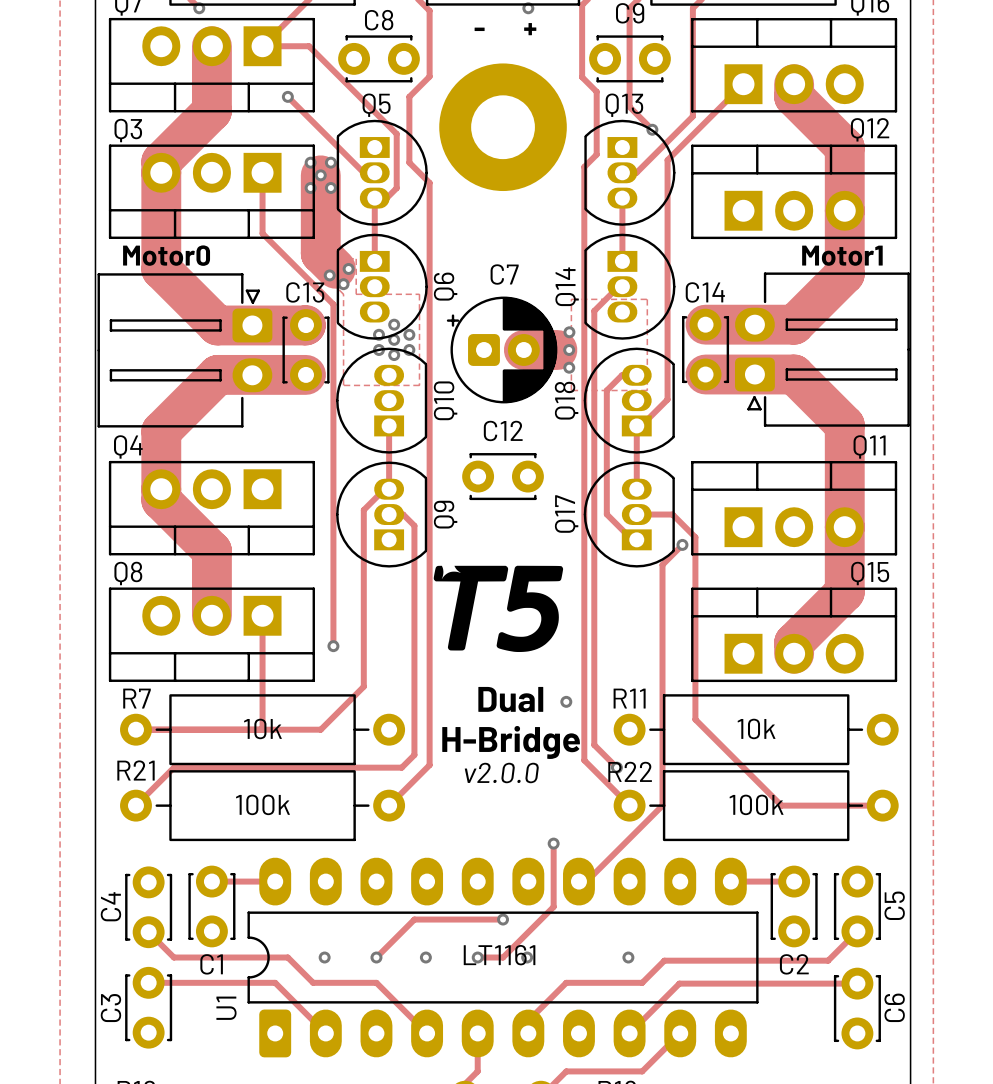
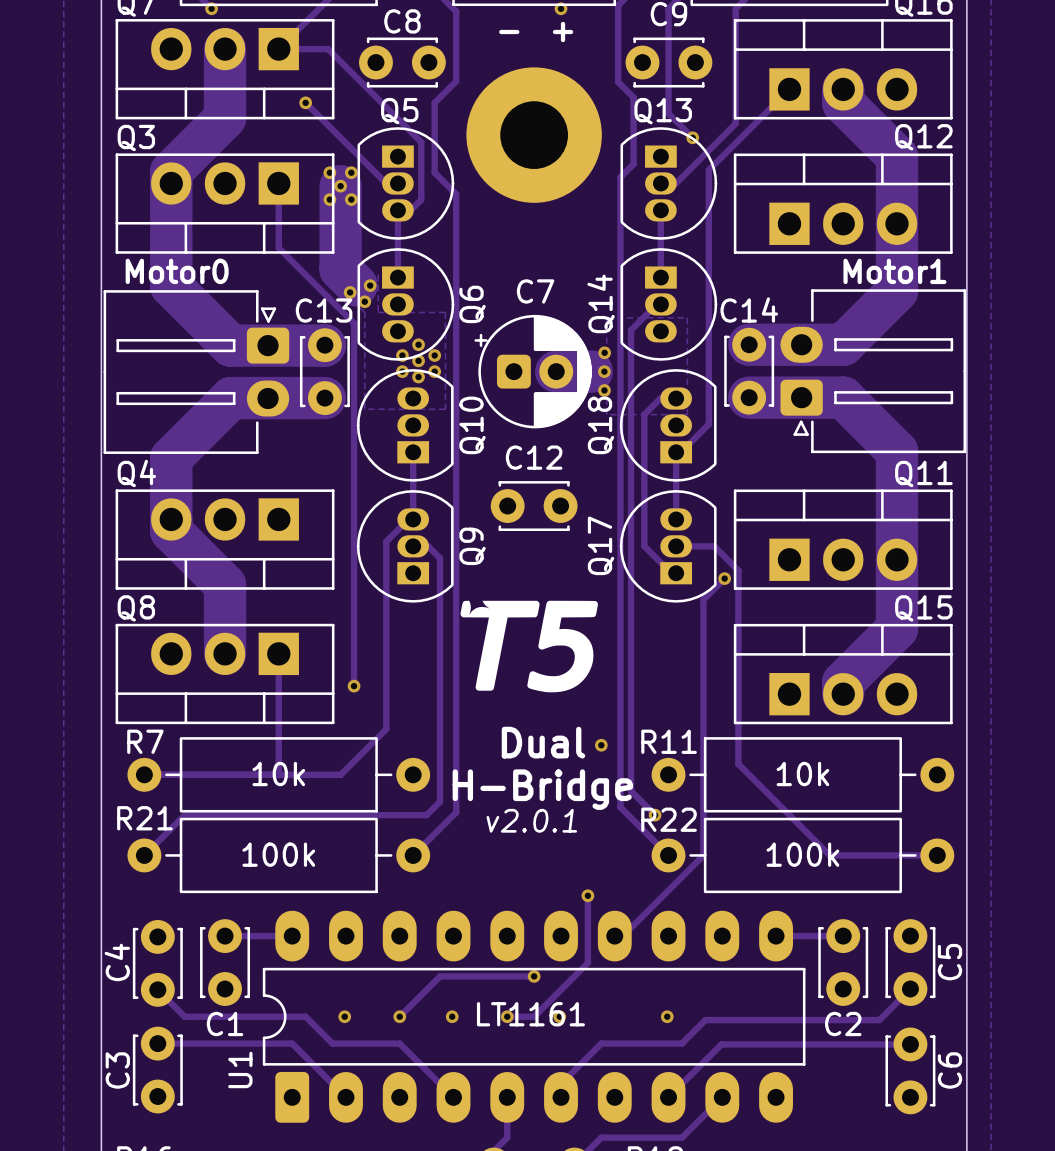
text: v2.0.0 (501, 772) -> v2.0.1 (531, 820)

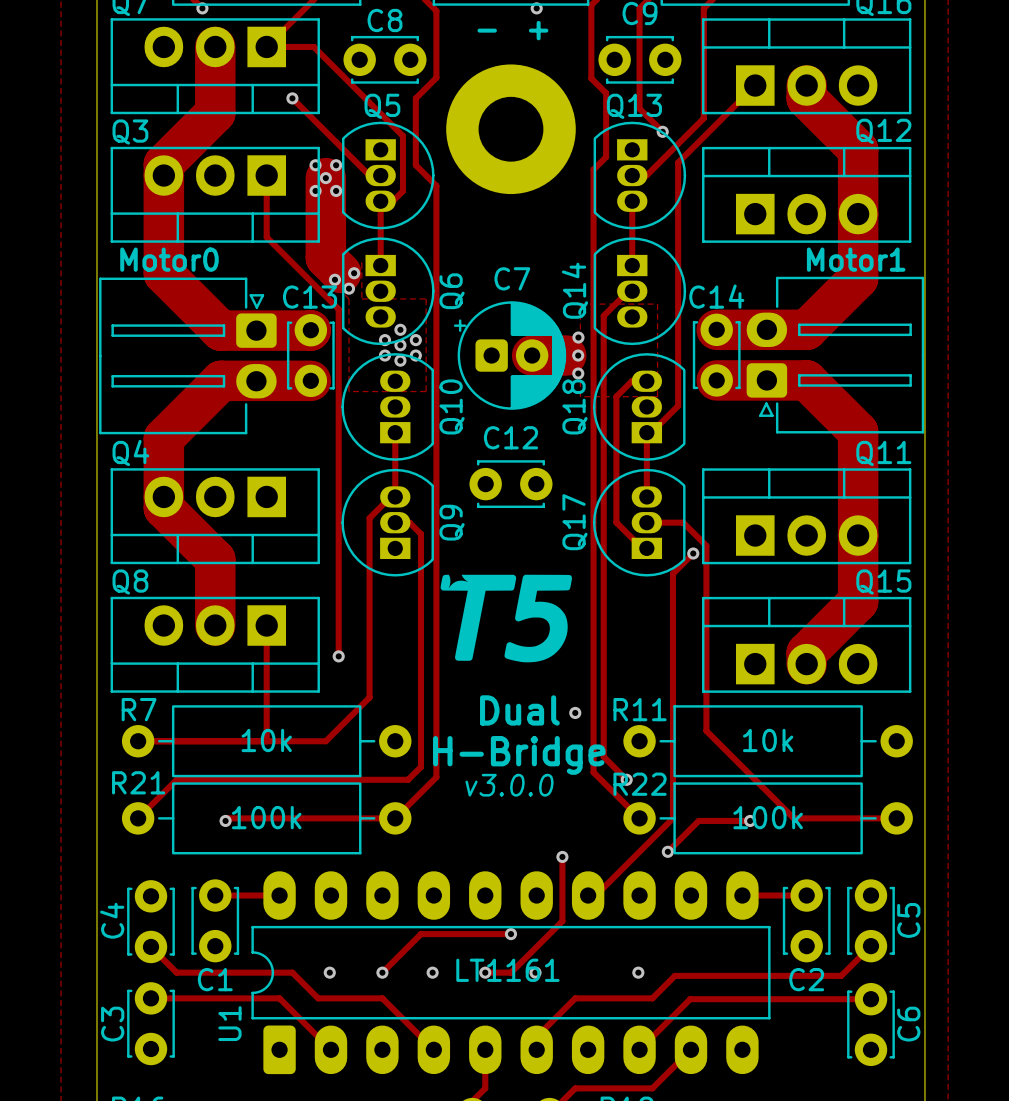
text: v2.0.1 (531, 820) -> v3.0.0 (509, 785)
track: none -> (395, 818) (228, 818) (225, 820)
via: none -> (225, 820)
track: none -> (750, 820) (698, 820) (667, 851)
via: none -> (750, 820)
via: none -> (667, 851)

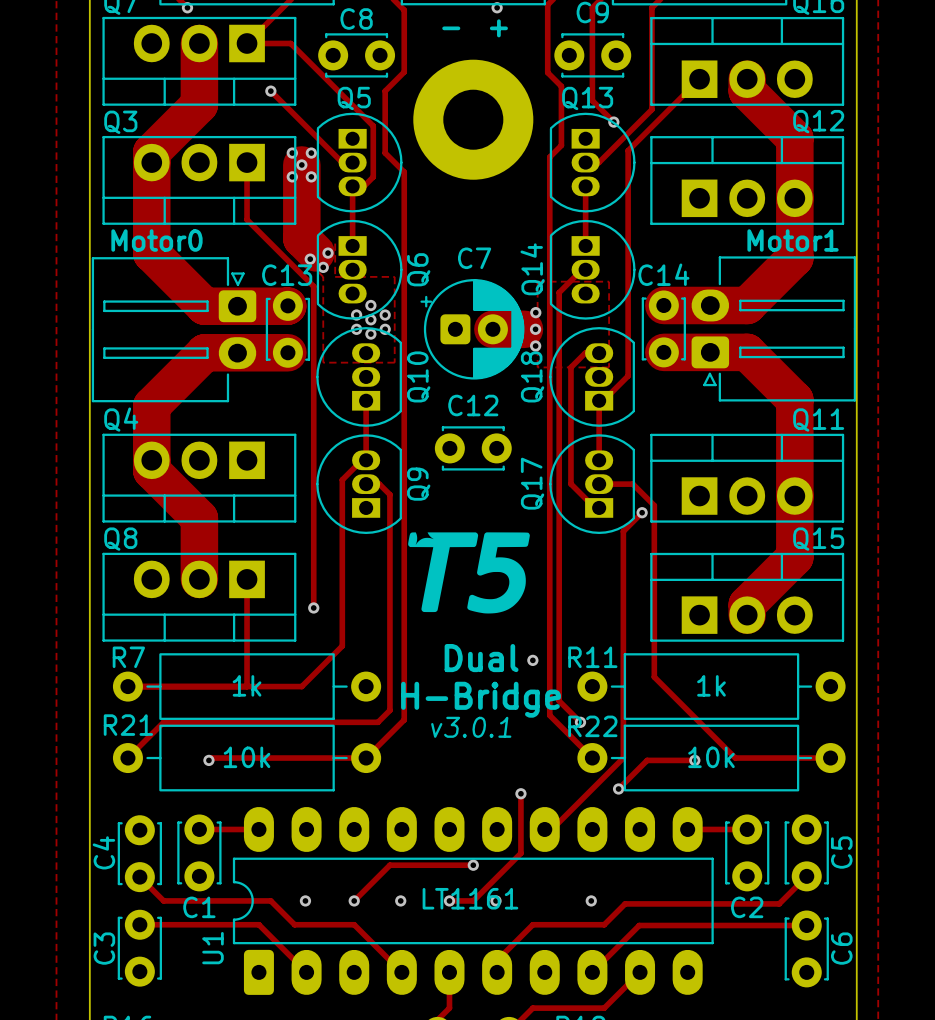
R7 value: 10k (266, 740) -> 1k (247, 685)
R11 value: 10k (768, 740) -> 1k (711, 685)
text: v3.0.0 (509, 785) -> v3.0.1 (471, 727)
R21 value: 100k (266, 817) -> 10k (247, 757)
R22 value: 100k (768, 817) -> 10k (711, 757)

